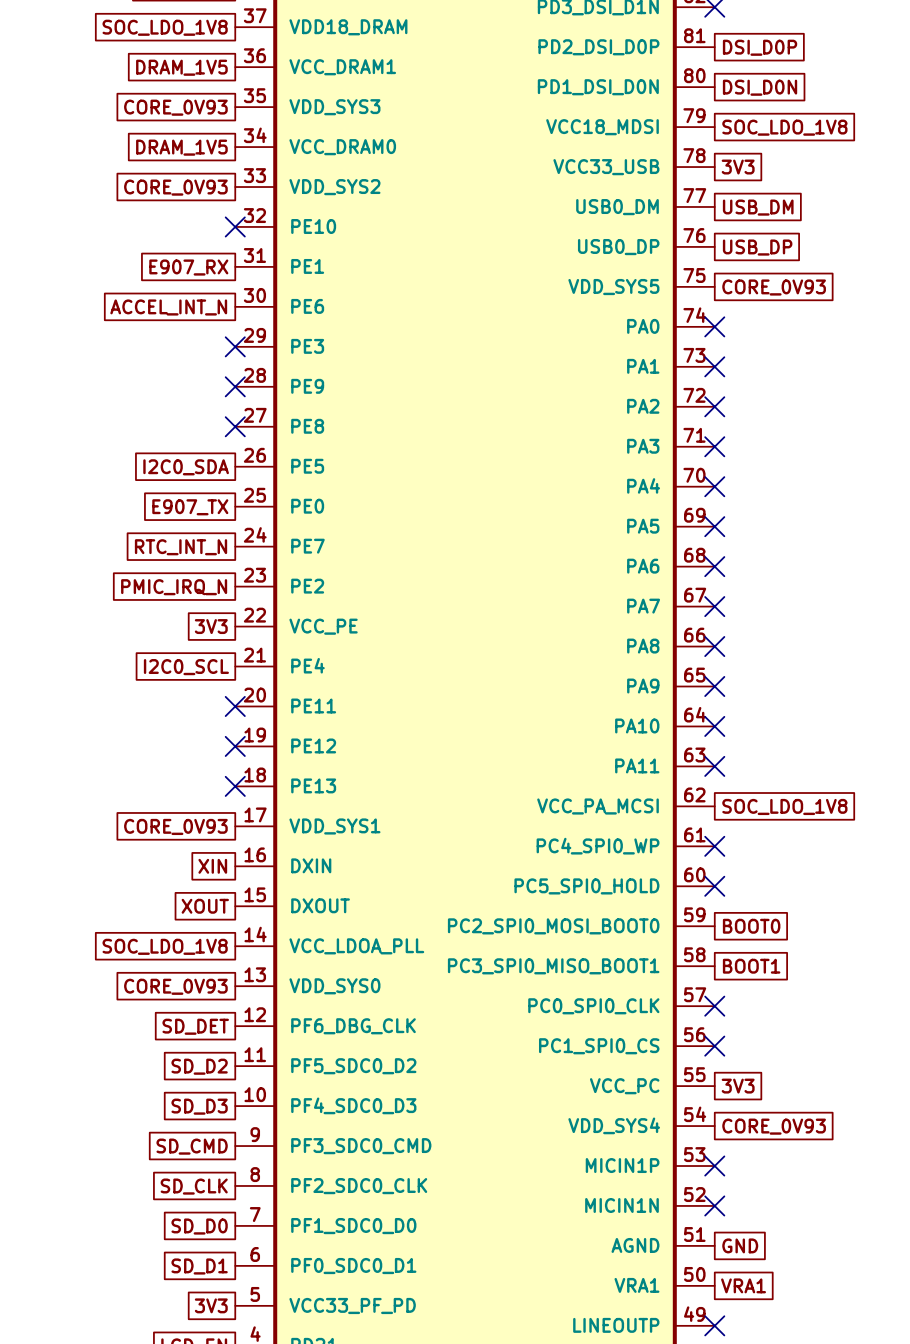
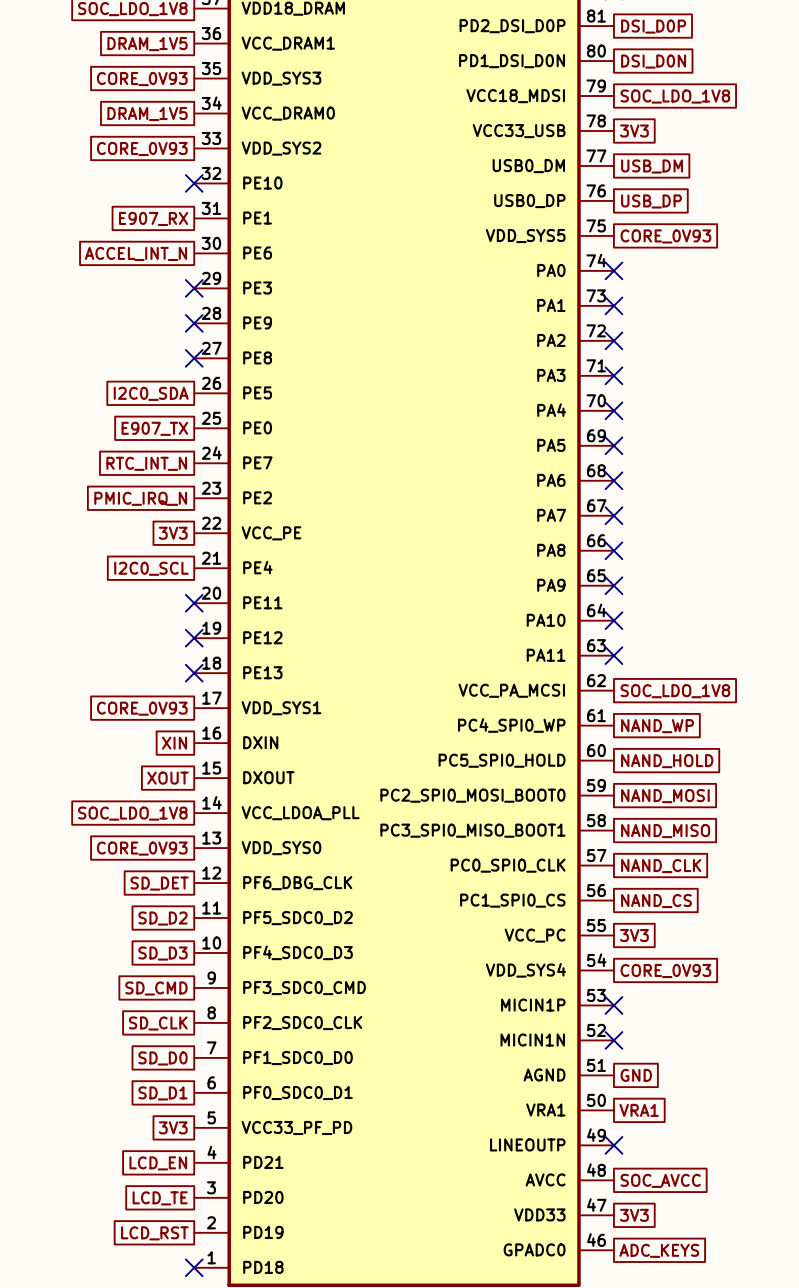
no-connect mark: (714, 846) -> none
global label: none -> NAND_WP (657, 726)
no-connect mark: (714, 886) -> none
global label: none -> NAND_HOLD (667, 761)
global label: BOOT0 (751, 926) -> NAND_MOSI (665, 796)
global label: BOOT1 (751, 966) -> NAND_MISO (665, 831)
no-connect mark: (714, 1006) -> none
global label: none -> NAND_CLK (661, 866)
no-connect mark: (714, 1046) -> none
global label: none -> NAND_CS (656, 901)

